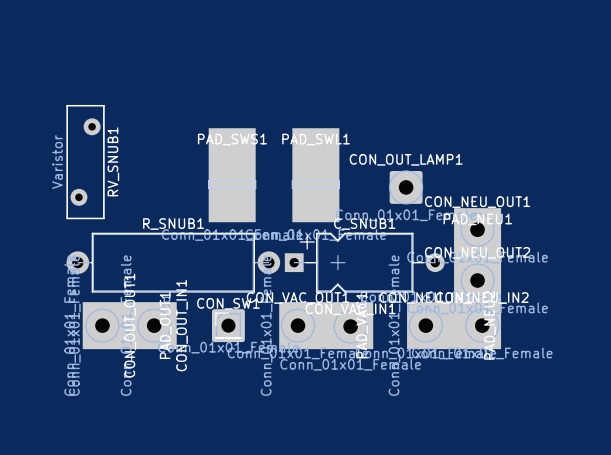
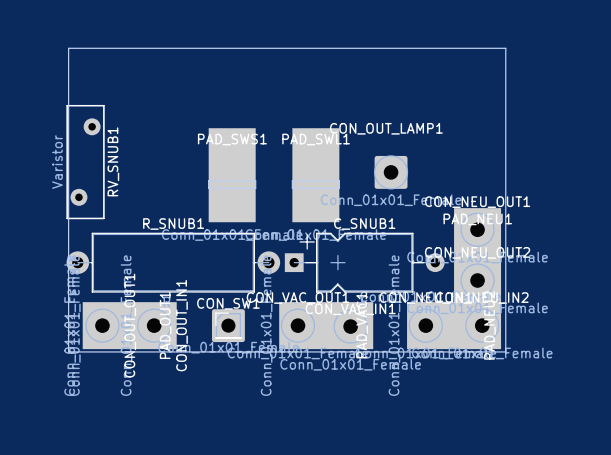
board edge: none -> (68, 48) (505, 48) (505, 351) (68, 351) (68, 48)
CON_OUT_LAMP1 name position: CON_OUT_LAMP1 (406, 159) -> CON_OUT_LAMP1 (386, 128)
CON_OUT_LAMP1 position: (406, 187) -> (391, 172)

